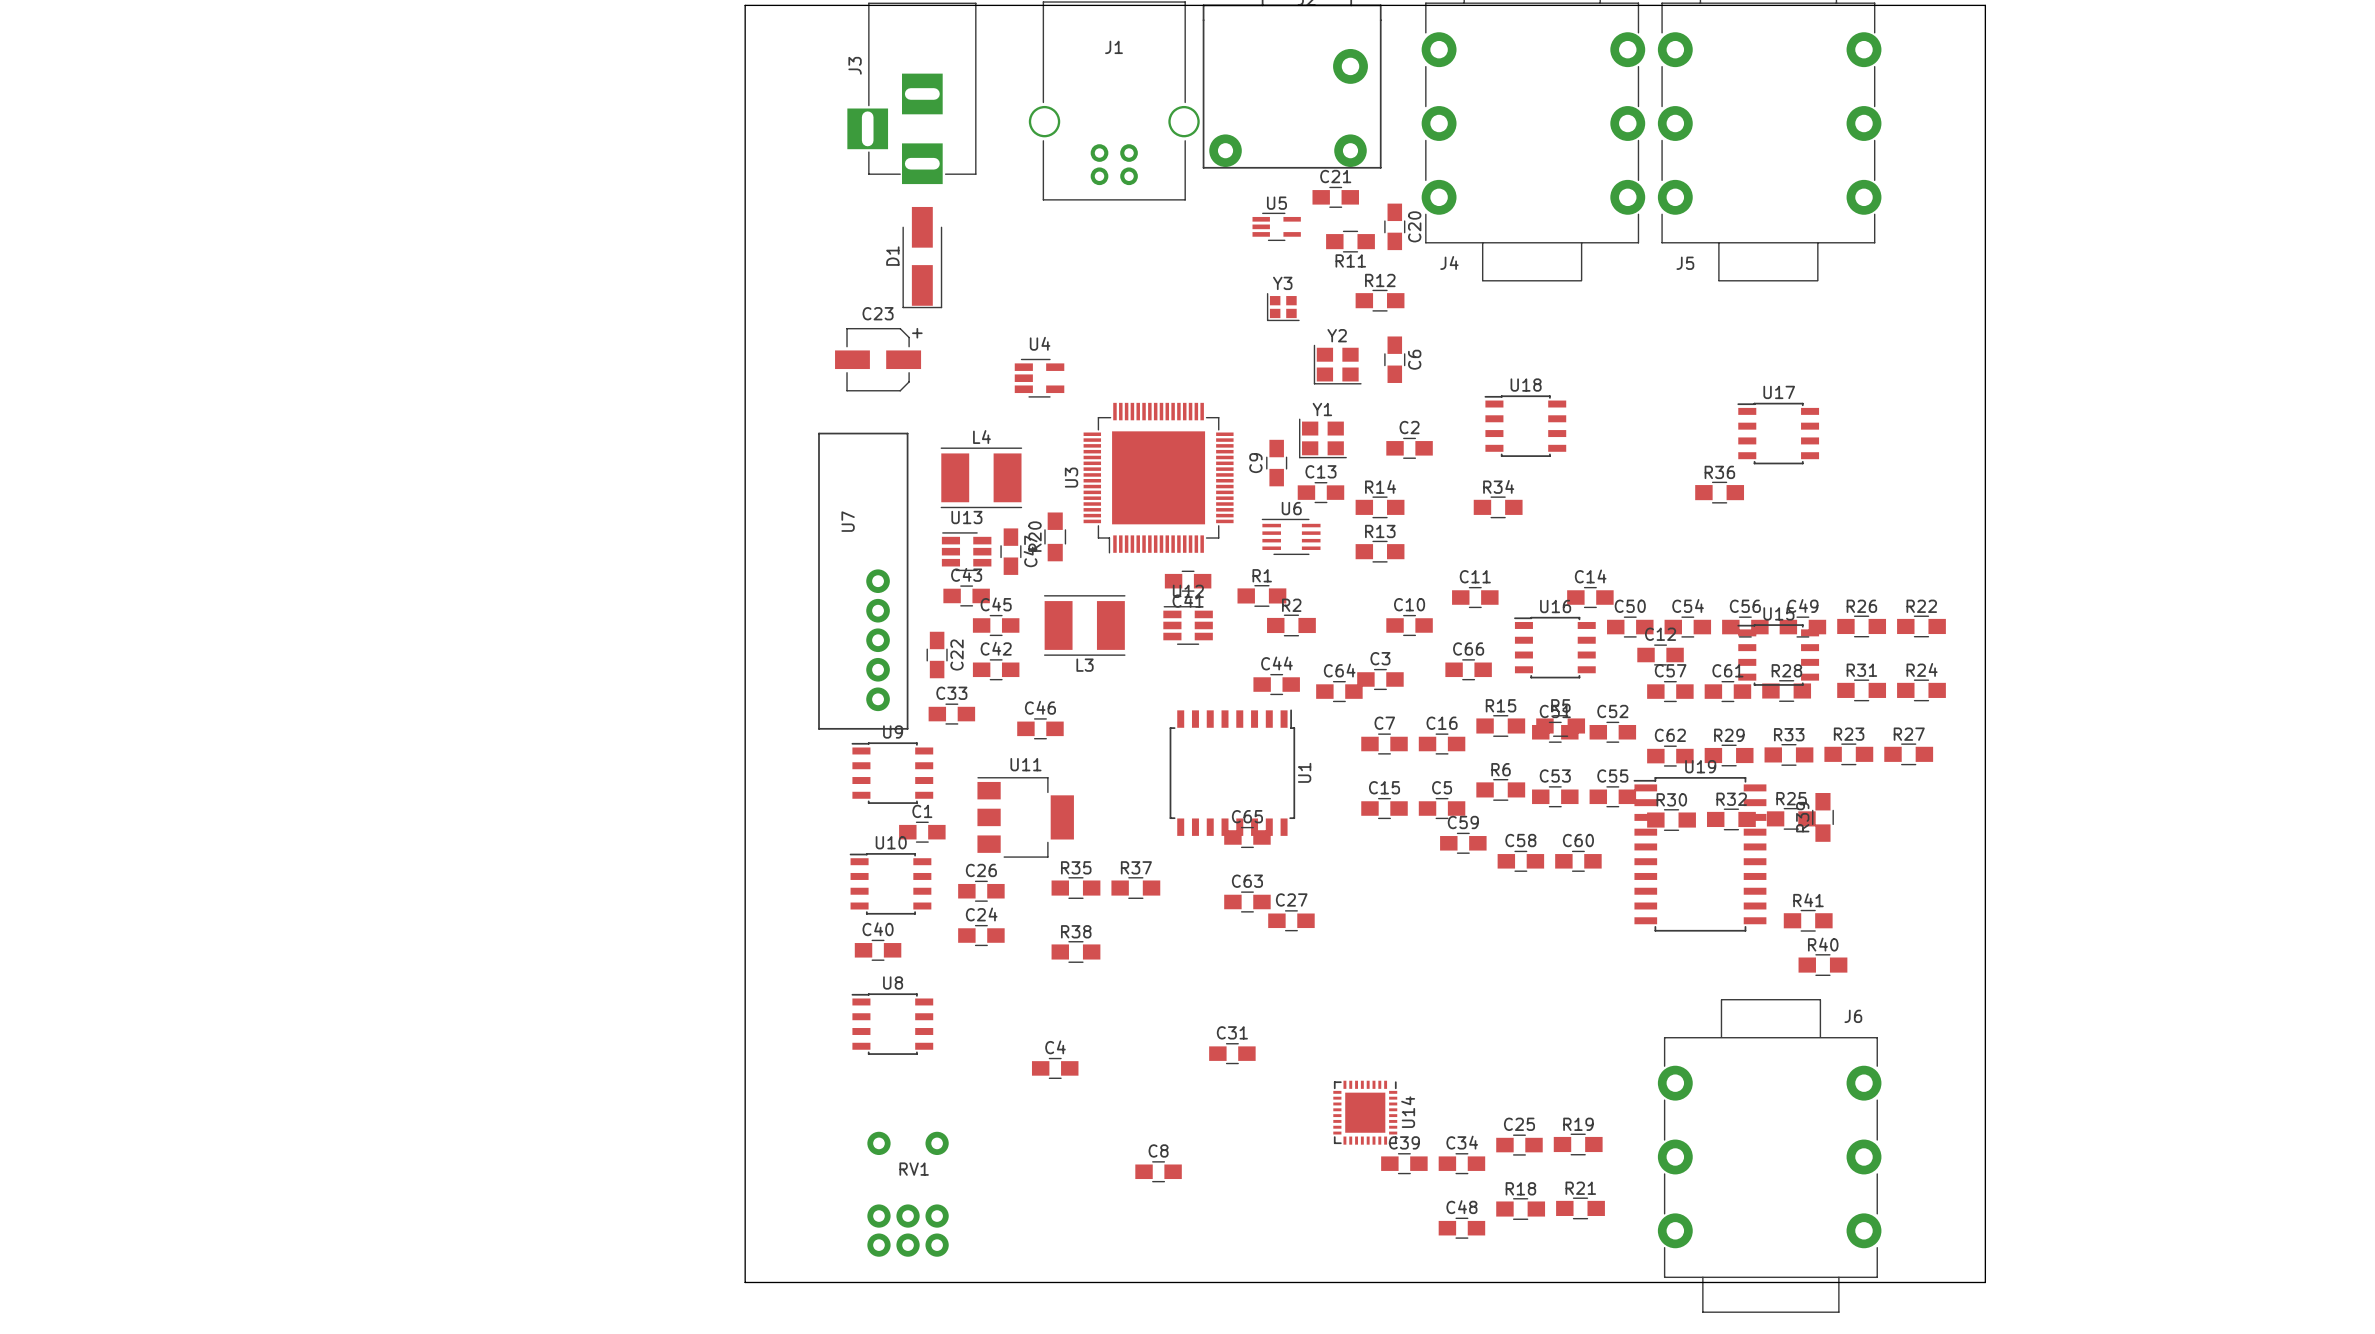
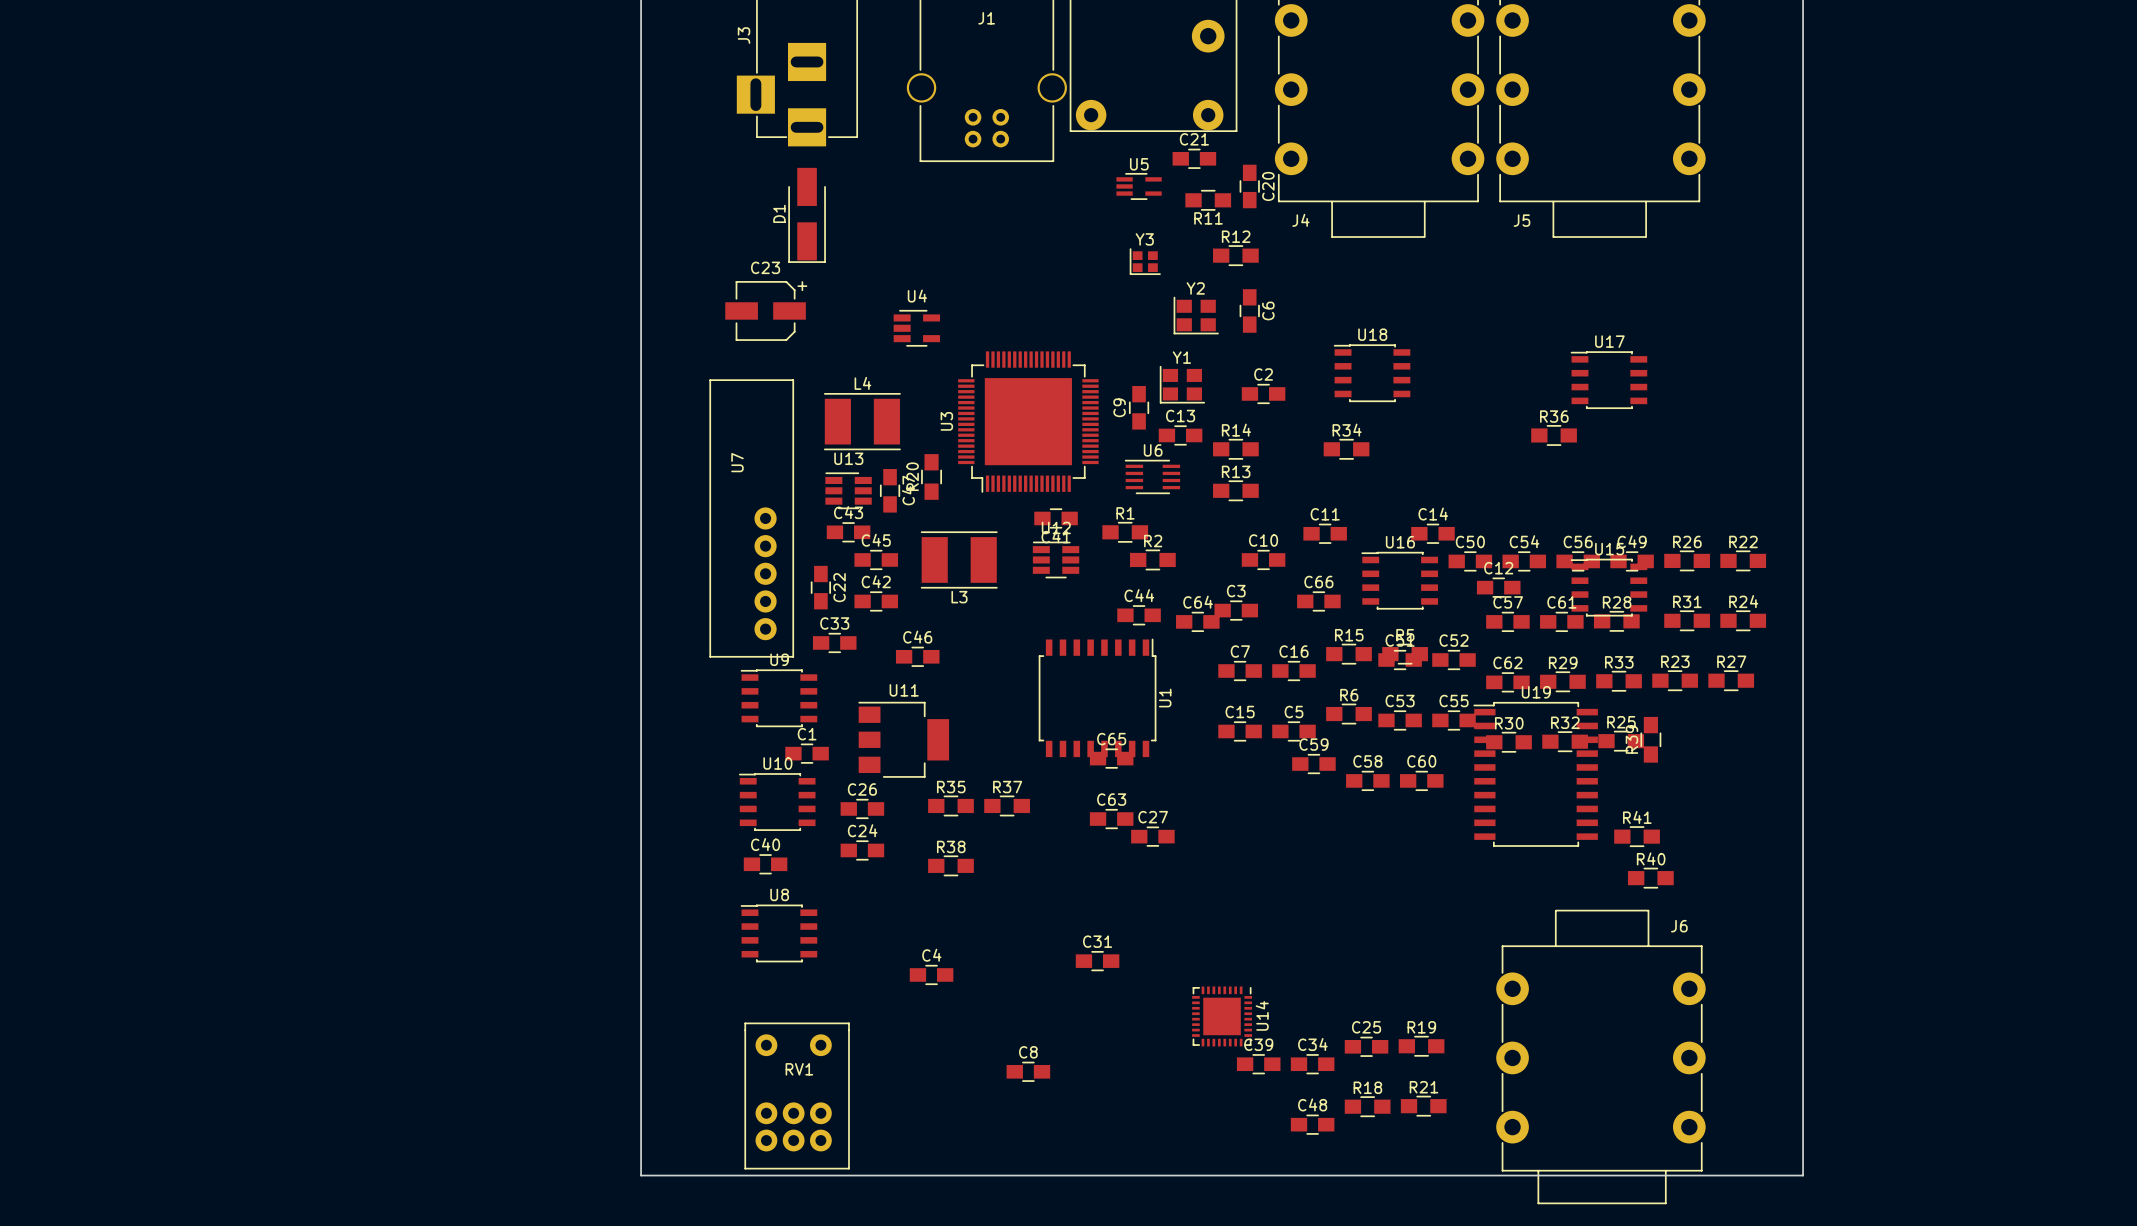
RV1 footprint: [867, 1131, 949, 1257] -> [744, 1022, 850, 1170]

